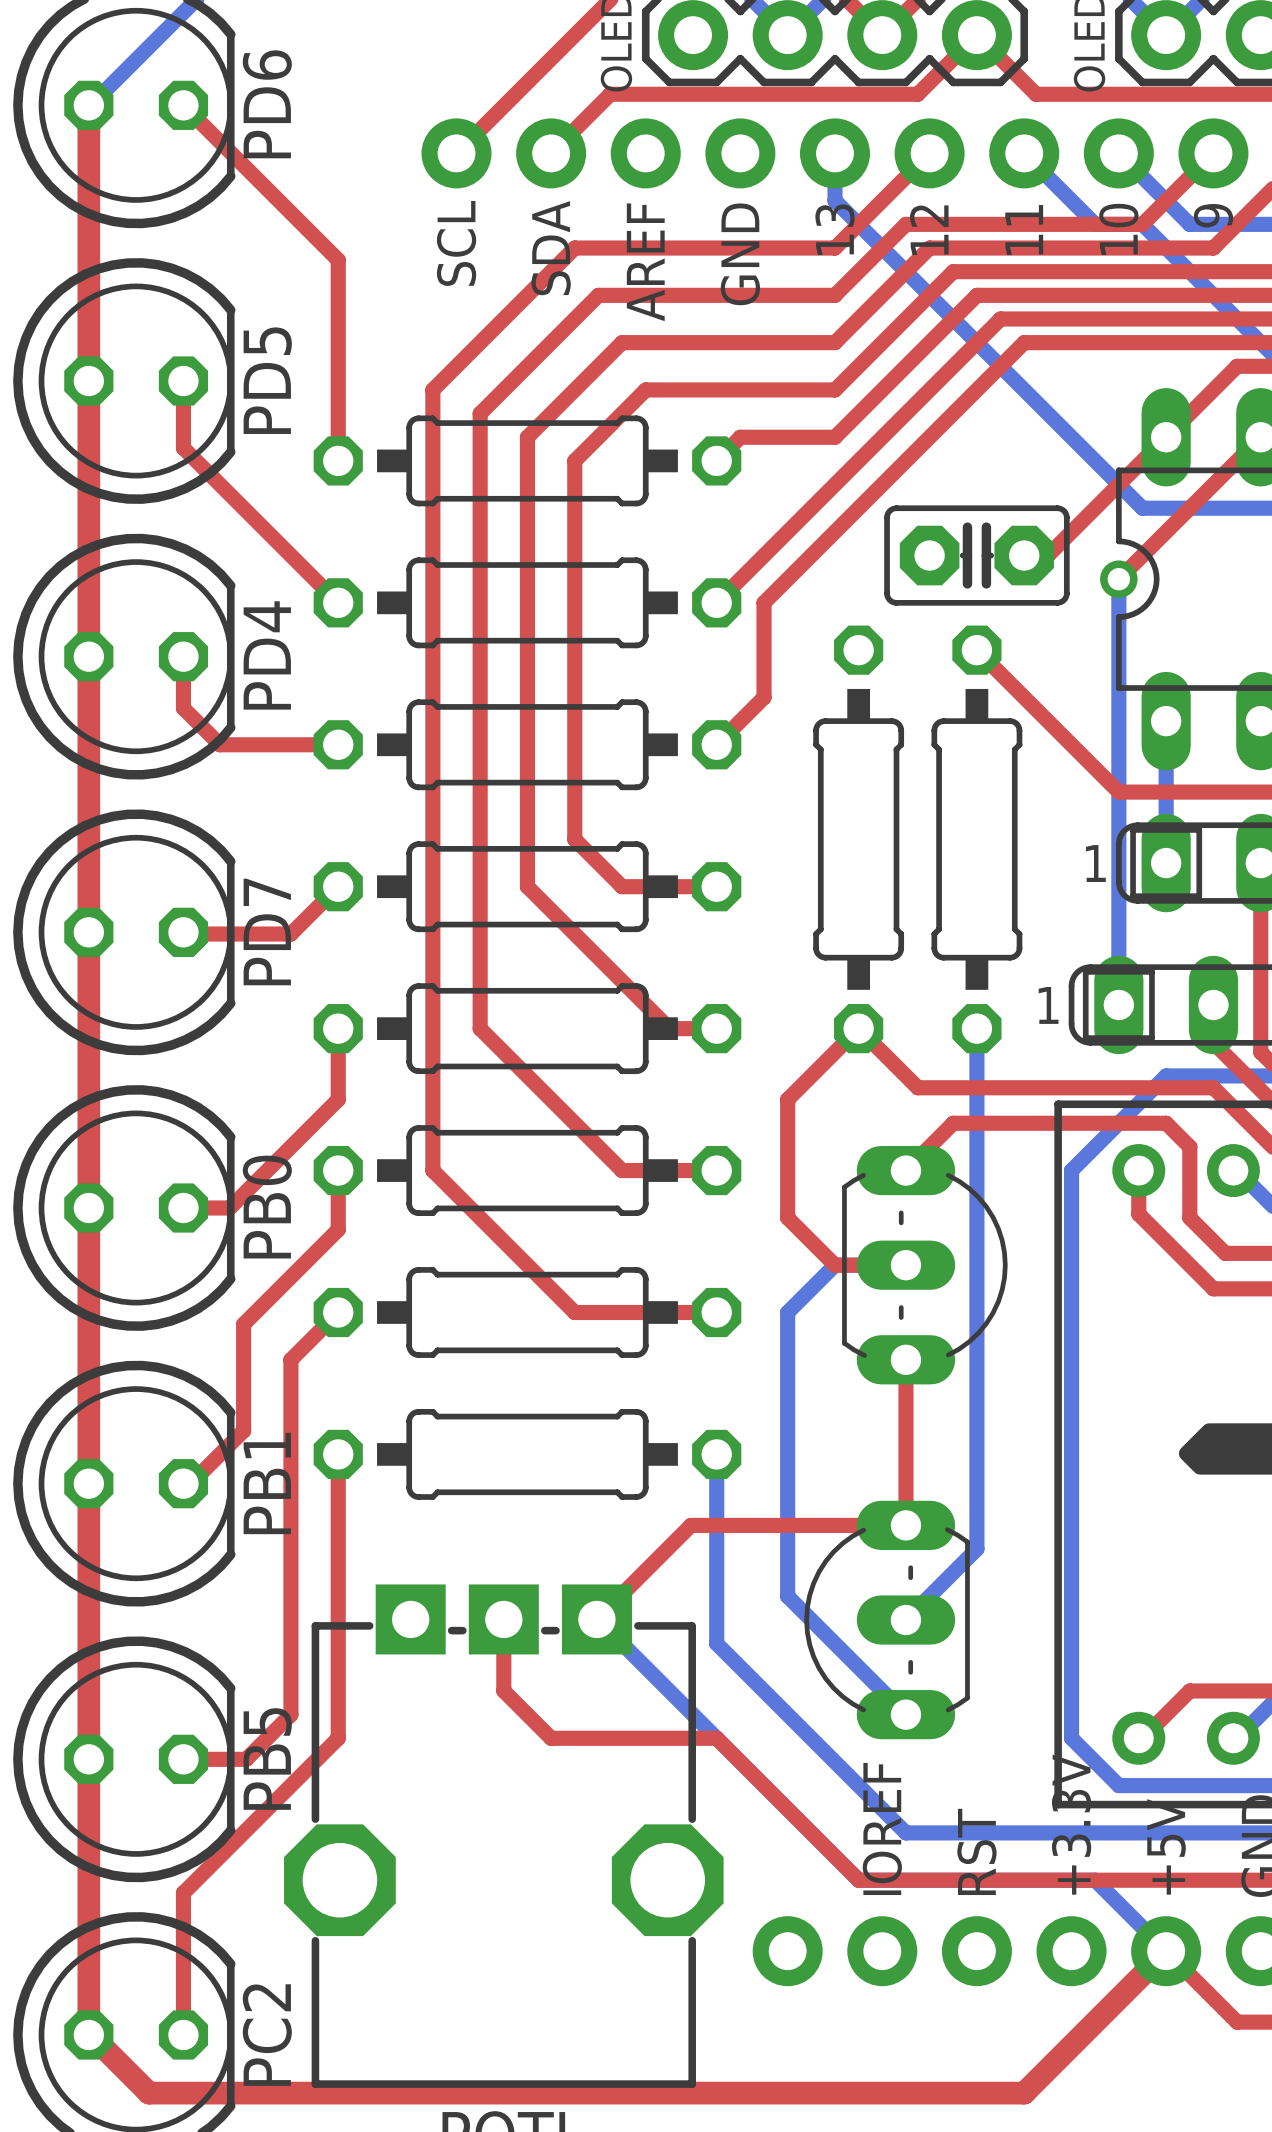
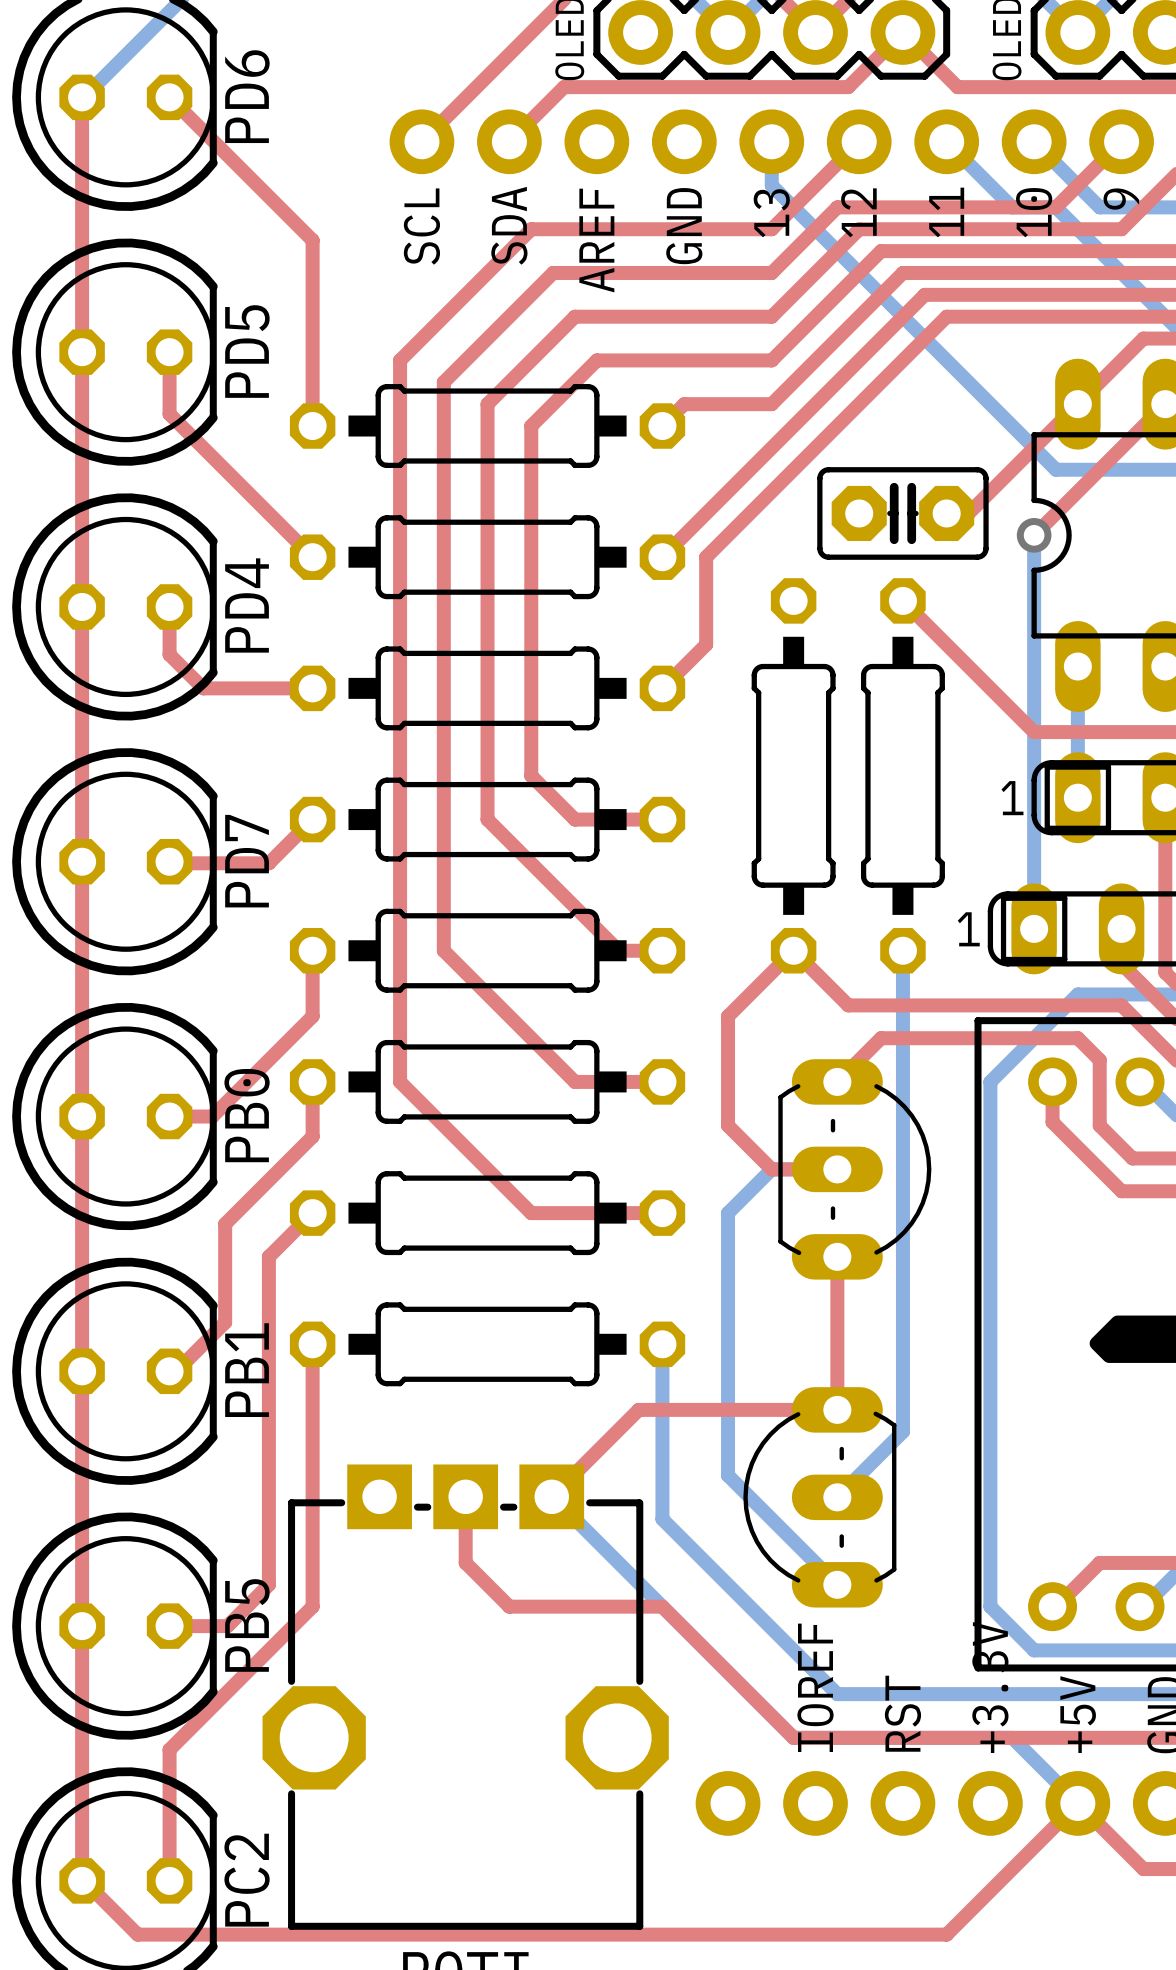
top track width: thick (88, 105) (88, 2035) -> thin (82, 97) (82, 1880)
top track width: thick (1166, 1951) (1024, 2093) (148, 2093) (90, 2035) -> thin (1077, 1803) (946, 1934) (137, 1934) (84, 1880)

